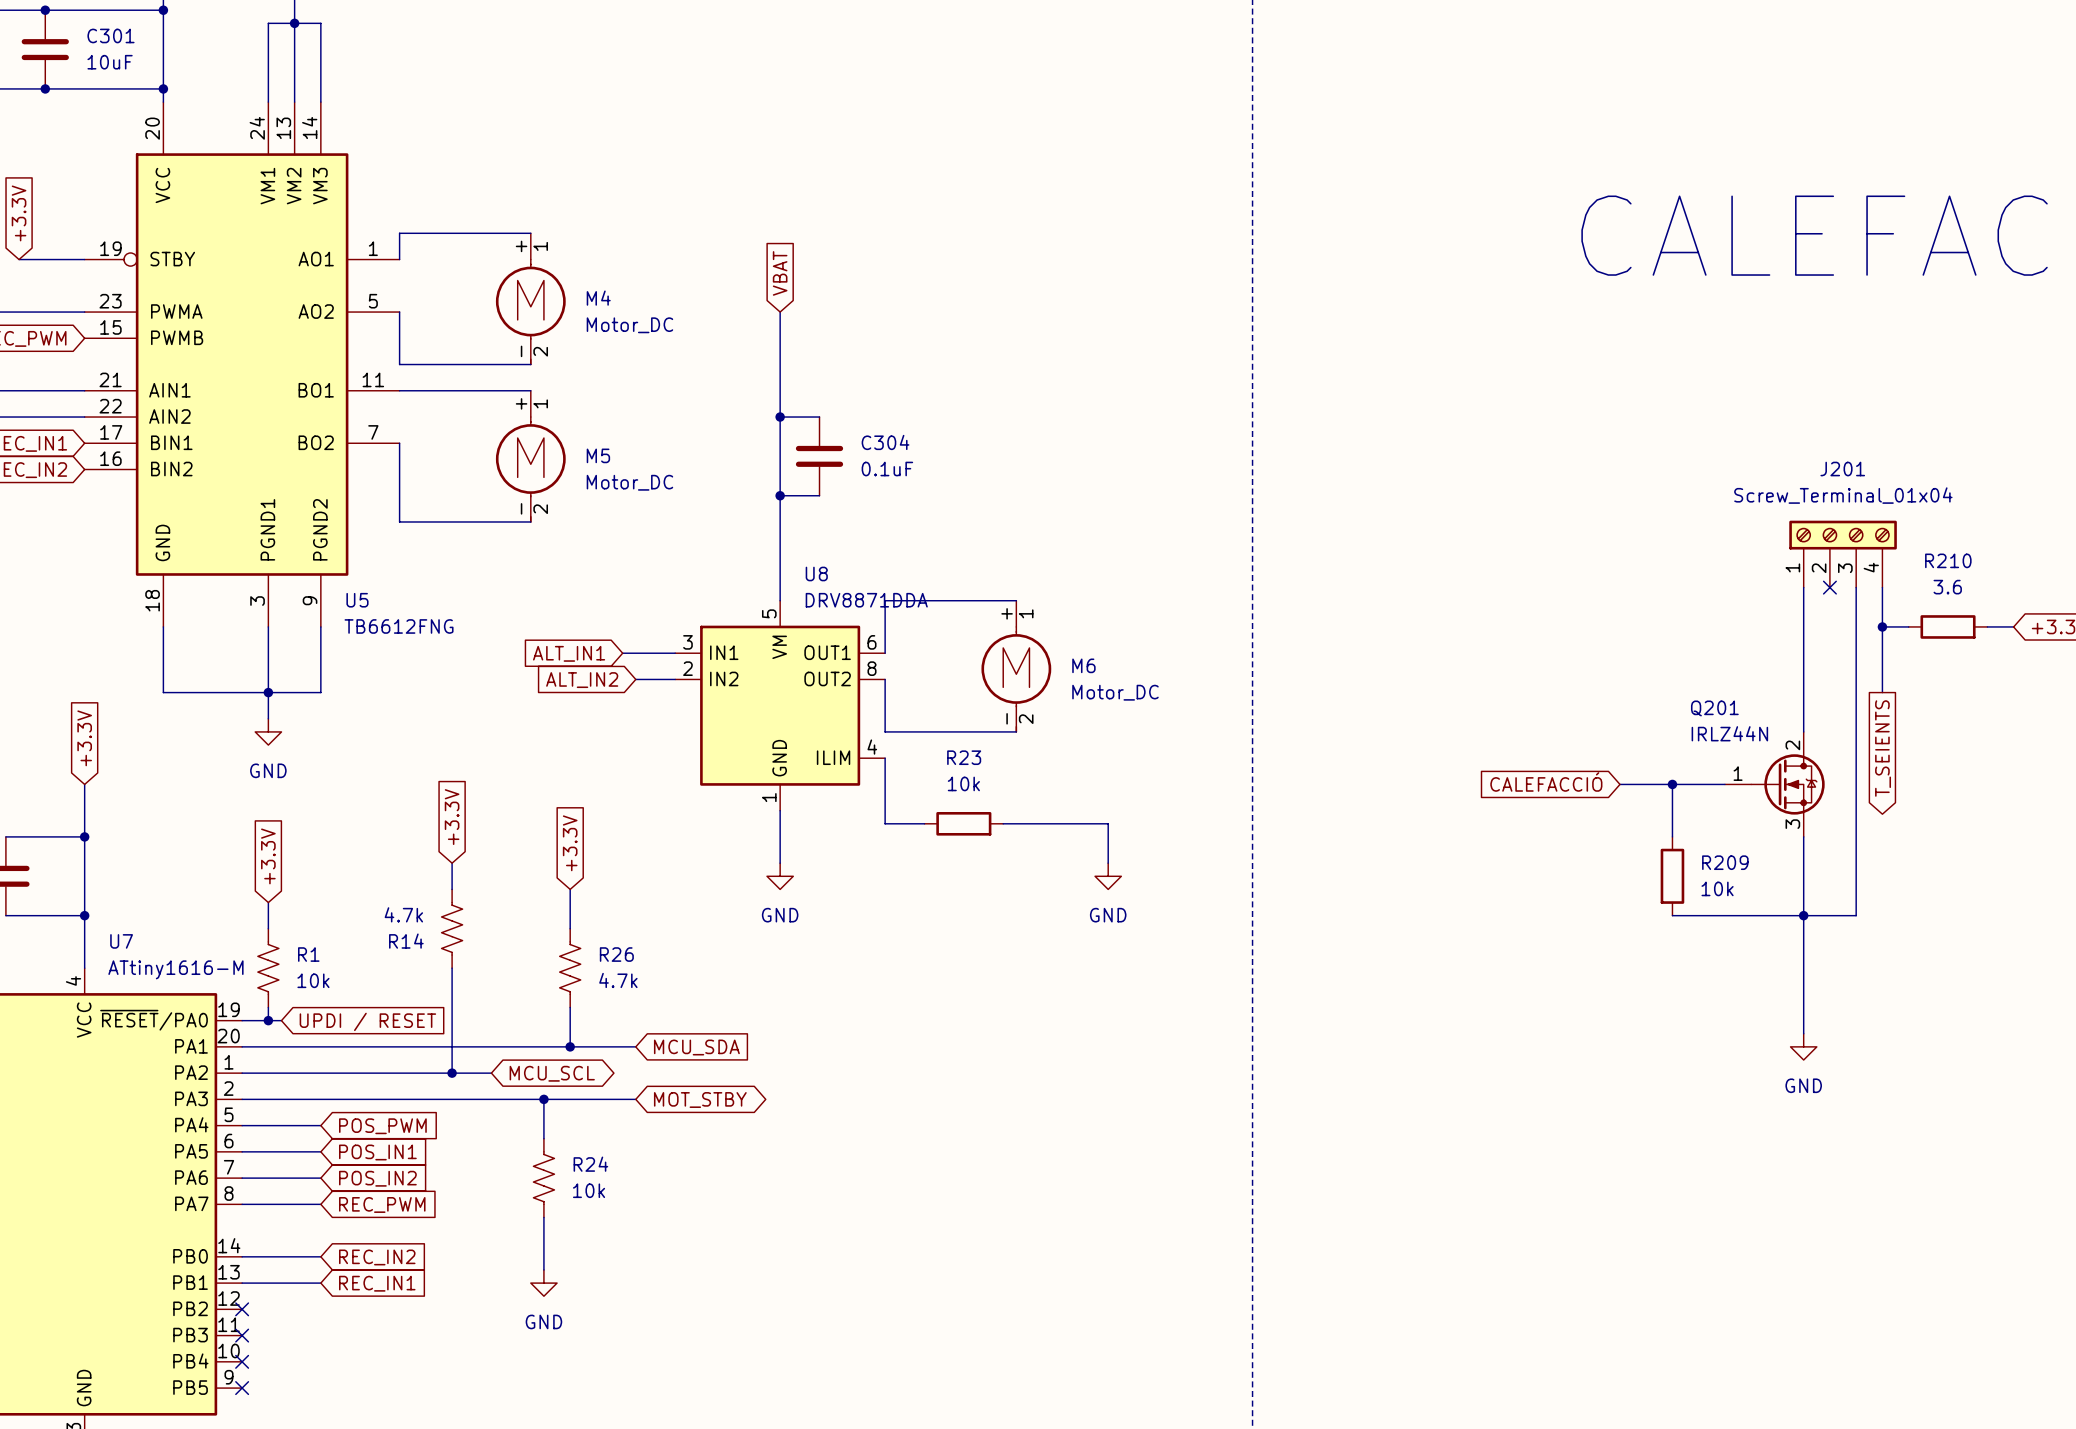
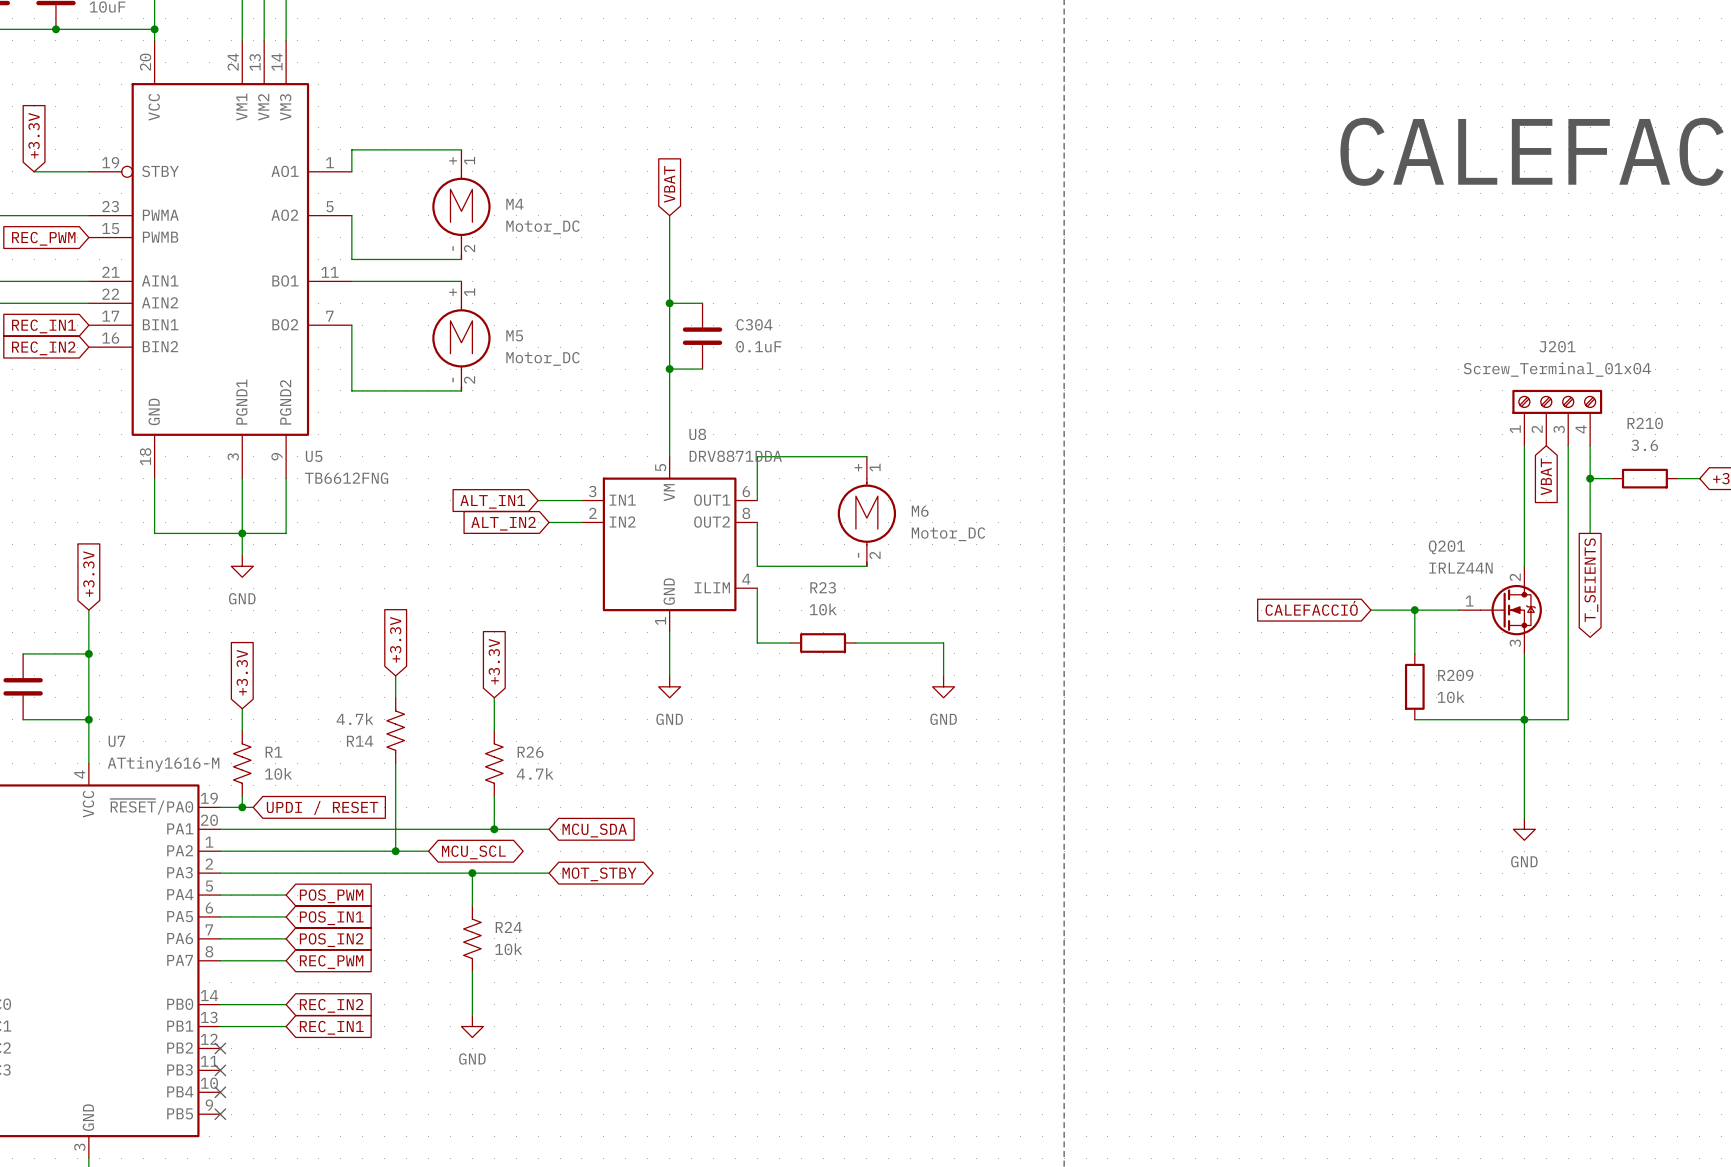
no-connect mark: (1829, 587) -> none
global label: none -> VBAT (1546, 476)

